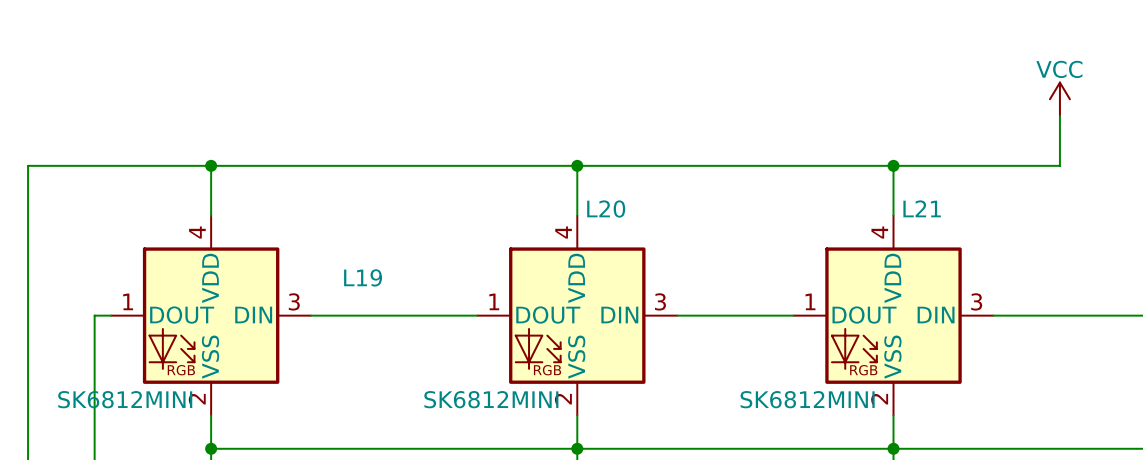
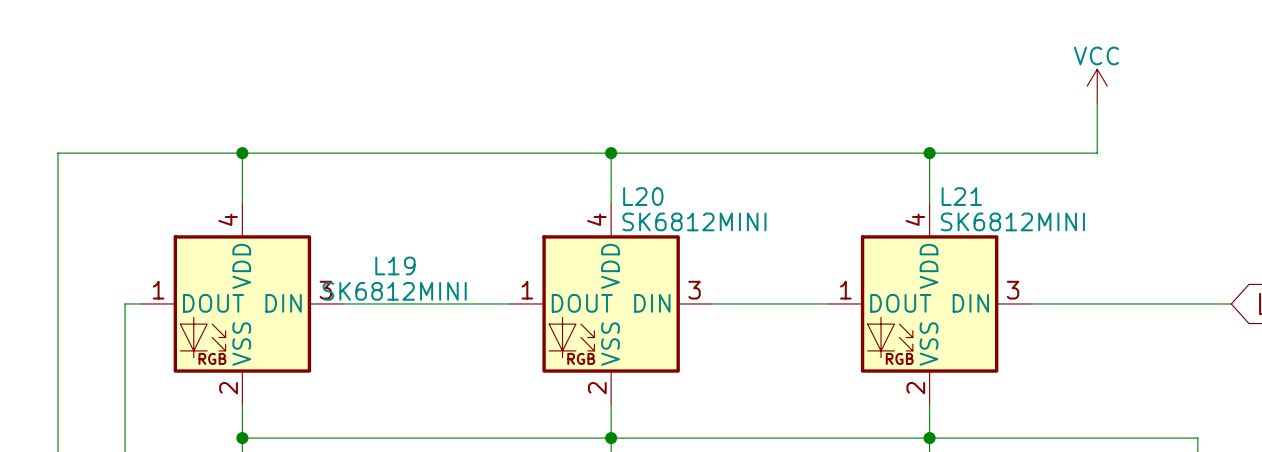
L19 value position: SK6812MINI (125, 399) -> SK6812MINI (394, 291)
L20 value position: SK6812MINI (491, 399) -> SK6812MINI (694, 221)
L21 value position: SK6812MINI (807, 399) -> SK6812MINI (1012, 221)

